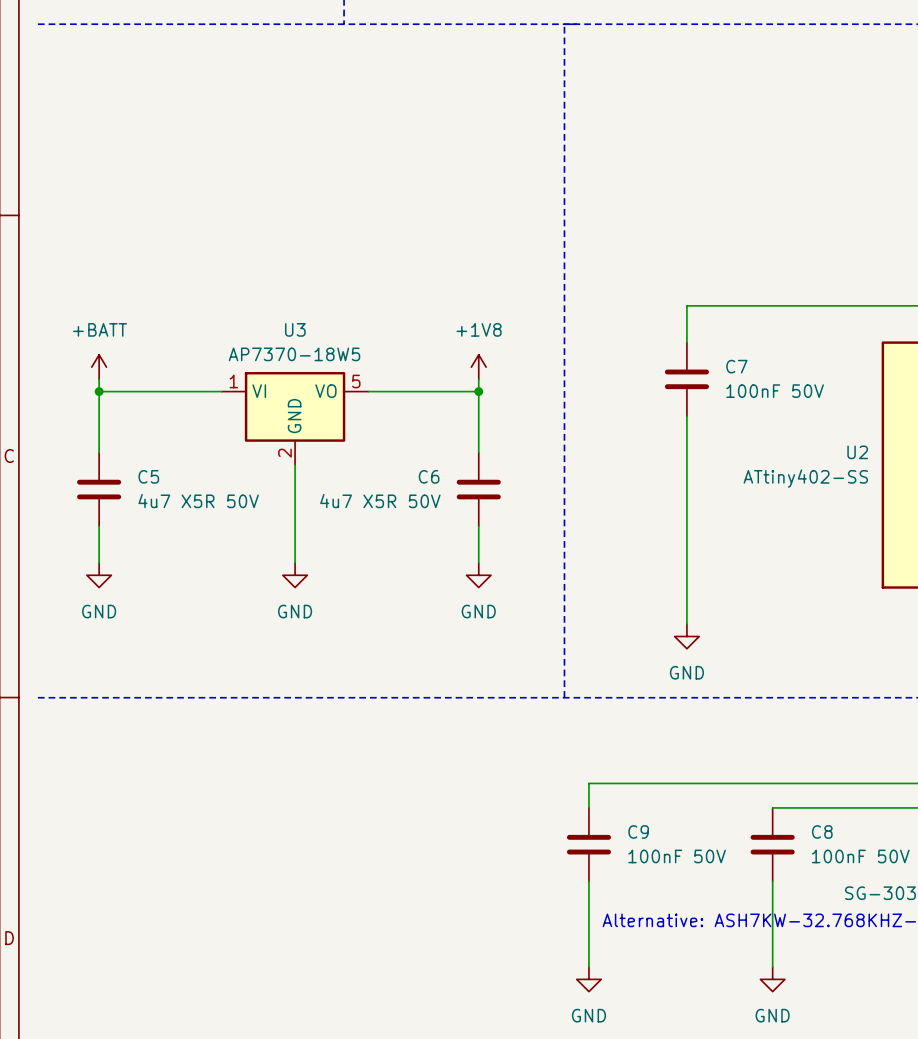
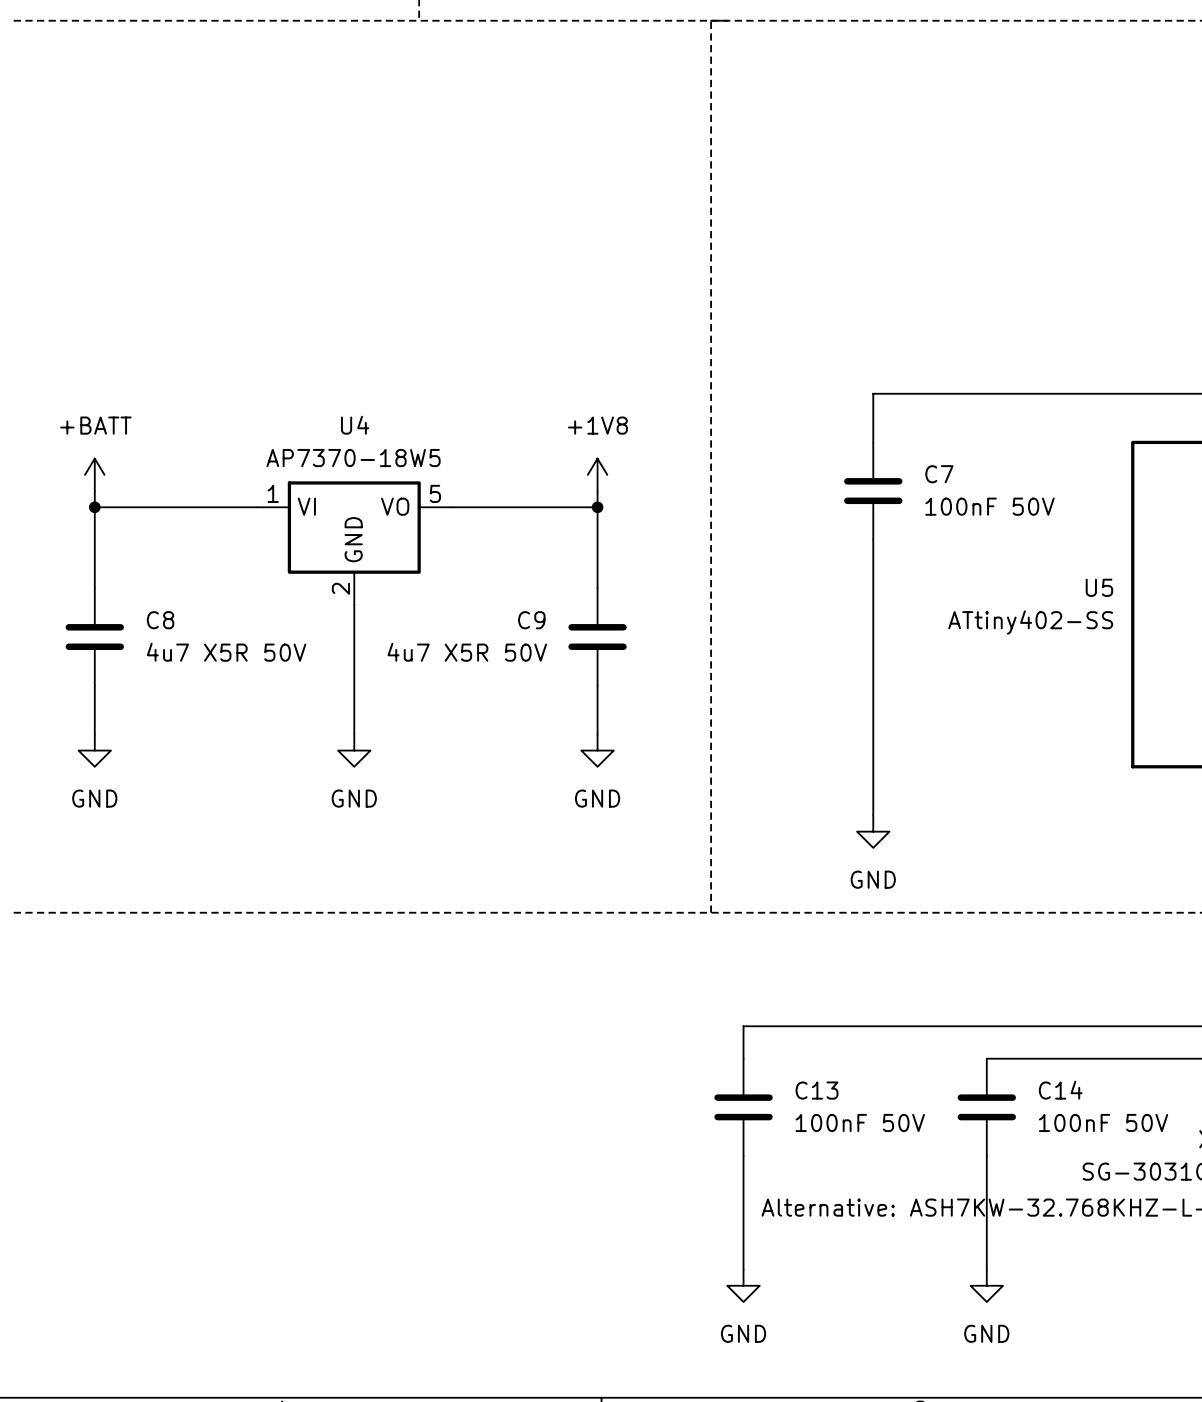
U3 name: U3 (295, 329) -> U4 (355, 425)
U2 name: U2 (857, 452) -> U5 (1099, 587)
C5 name: C5 (148, 476) -> C8 (160, 620)
C6 name: C6 (429, 476) -> C9 (531, 620)
C9 name: C9 (638, 831) -> C13 (817, 1090)
C8 name: C8 (822, 831) -> C14 (1060, 1090)

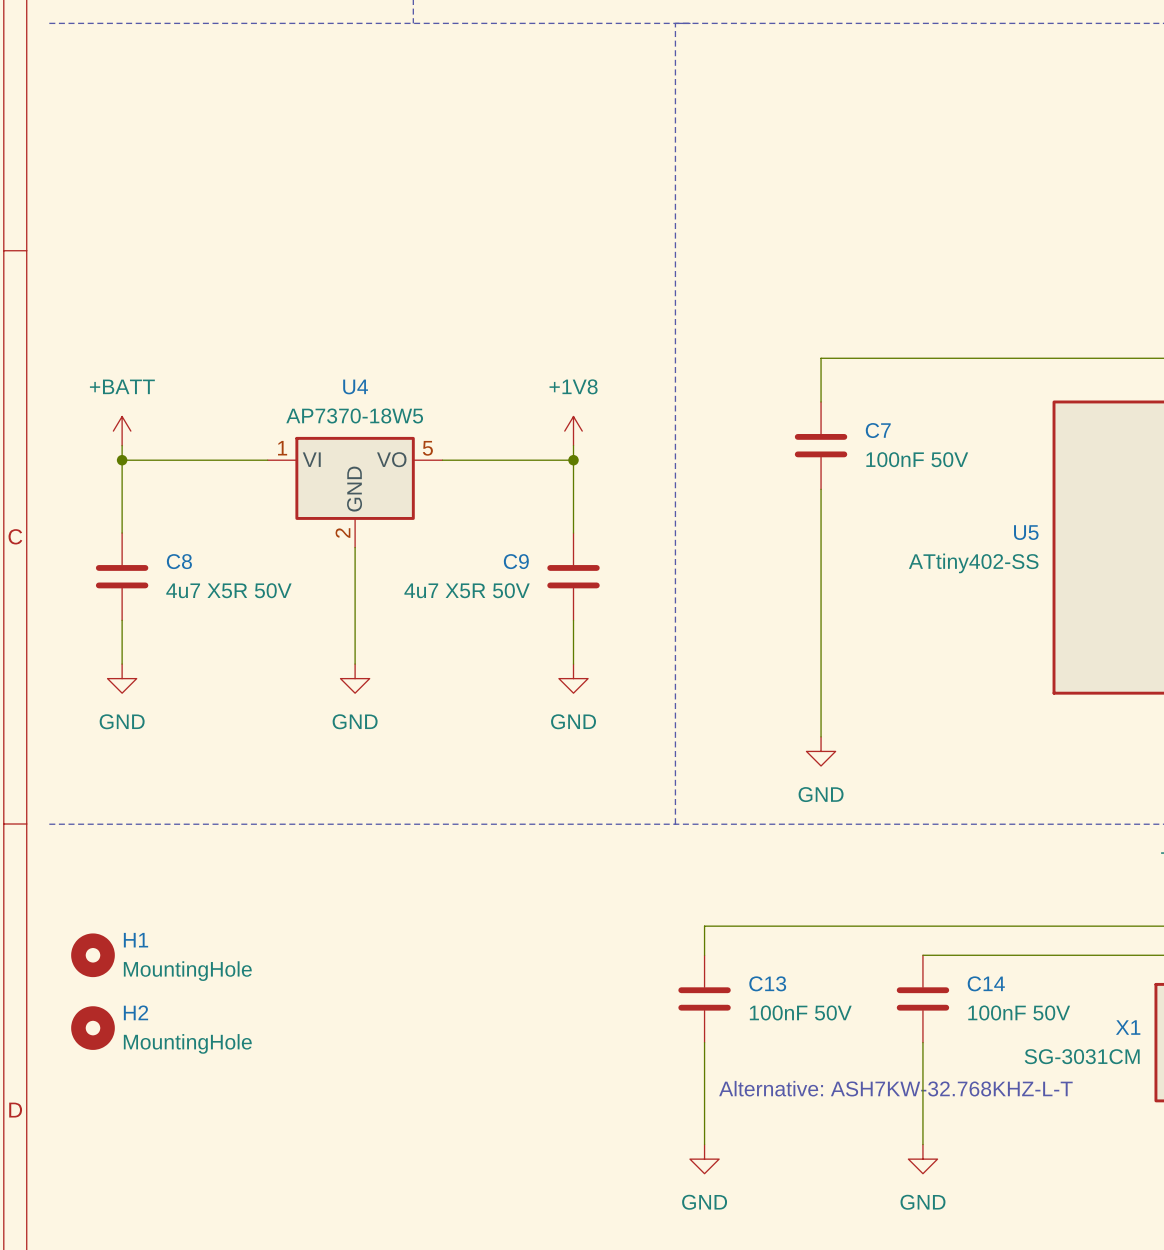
H1: none -> MountingHole (92, 955)
H2: none -> MountingHole (92, 1028)

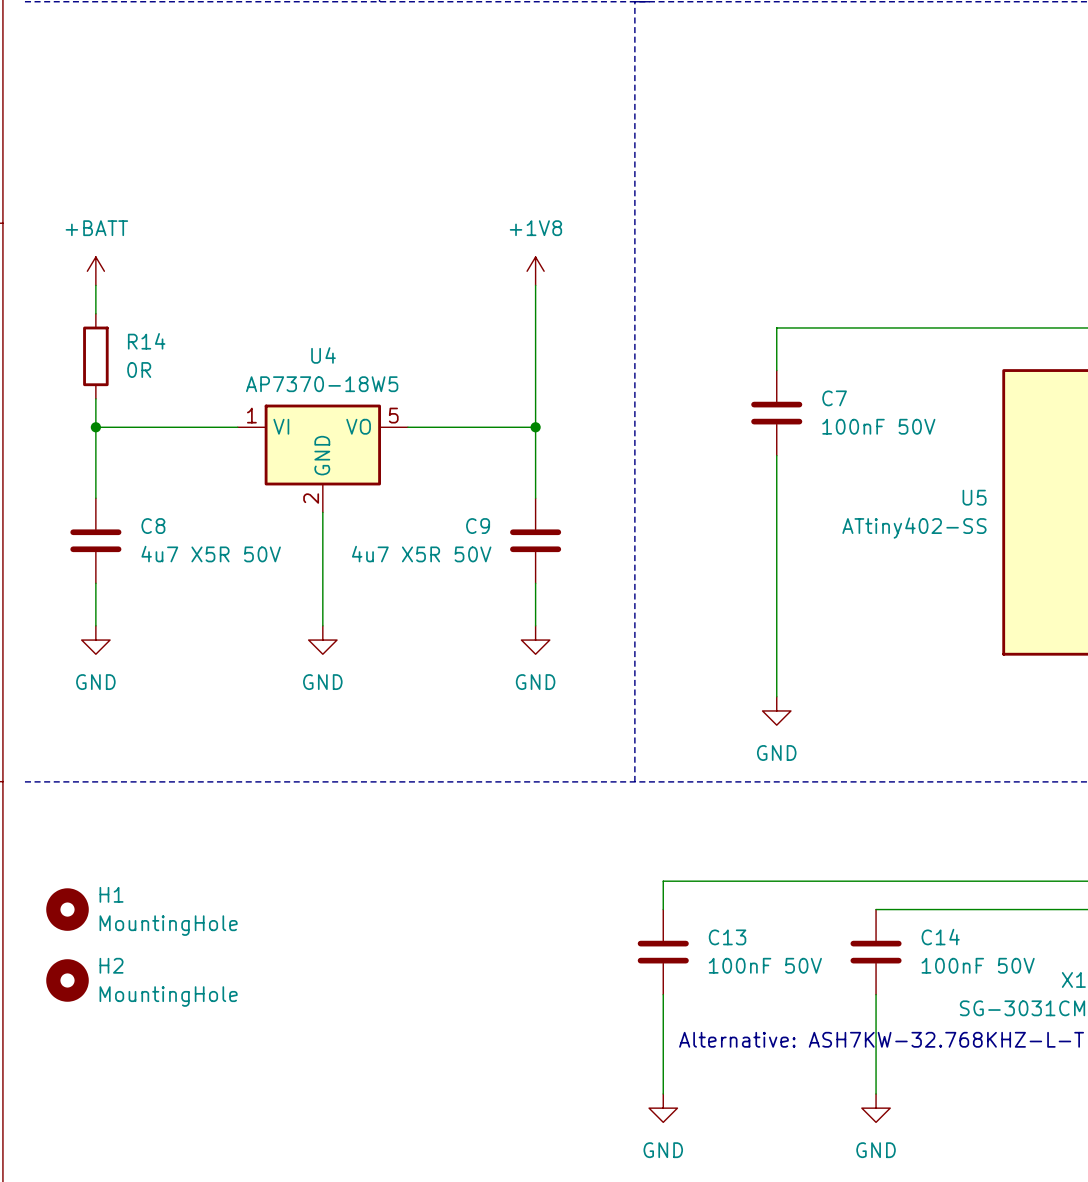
wire: none -> (95, 285) (95, 313)
wire: none -> (535, 285) (535, 413)
R14: none -> 0R (95, 356)
power symbol position: +BATT (122, 431) -> +BATT (95, 271)
power symbol position: +1V8 (573, 431) -> +1V8 (535, 271)

